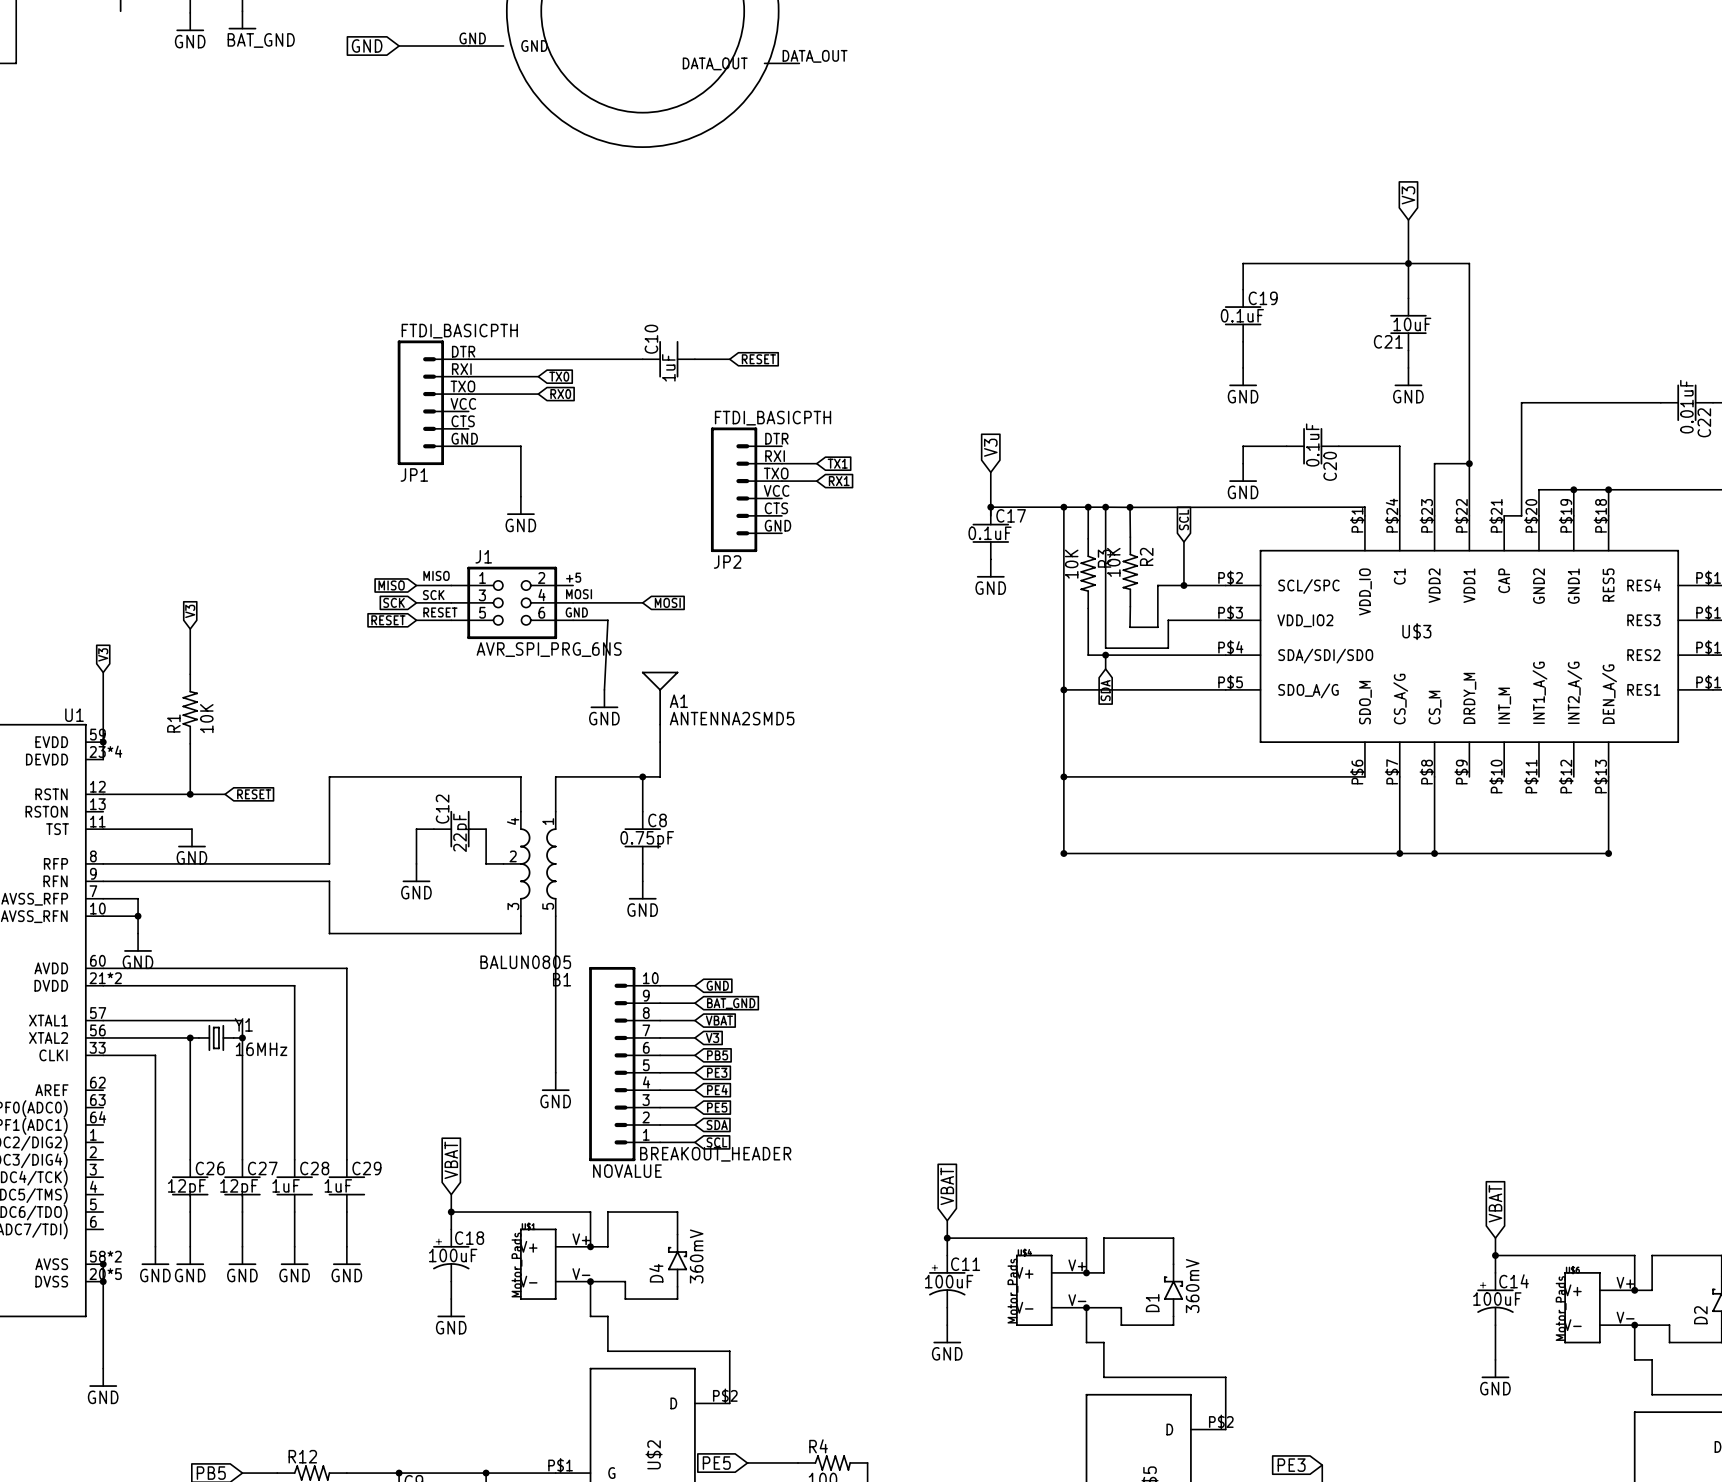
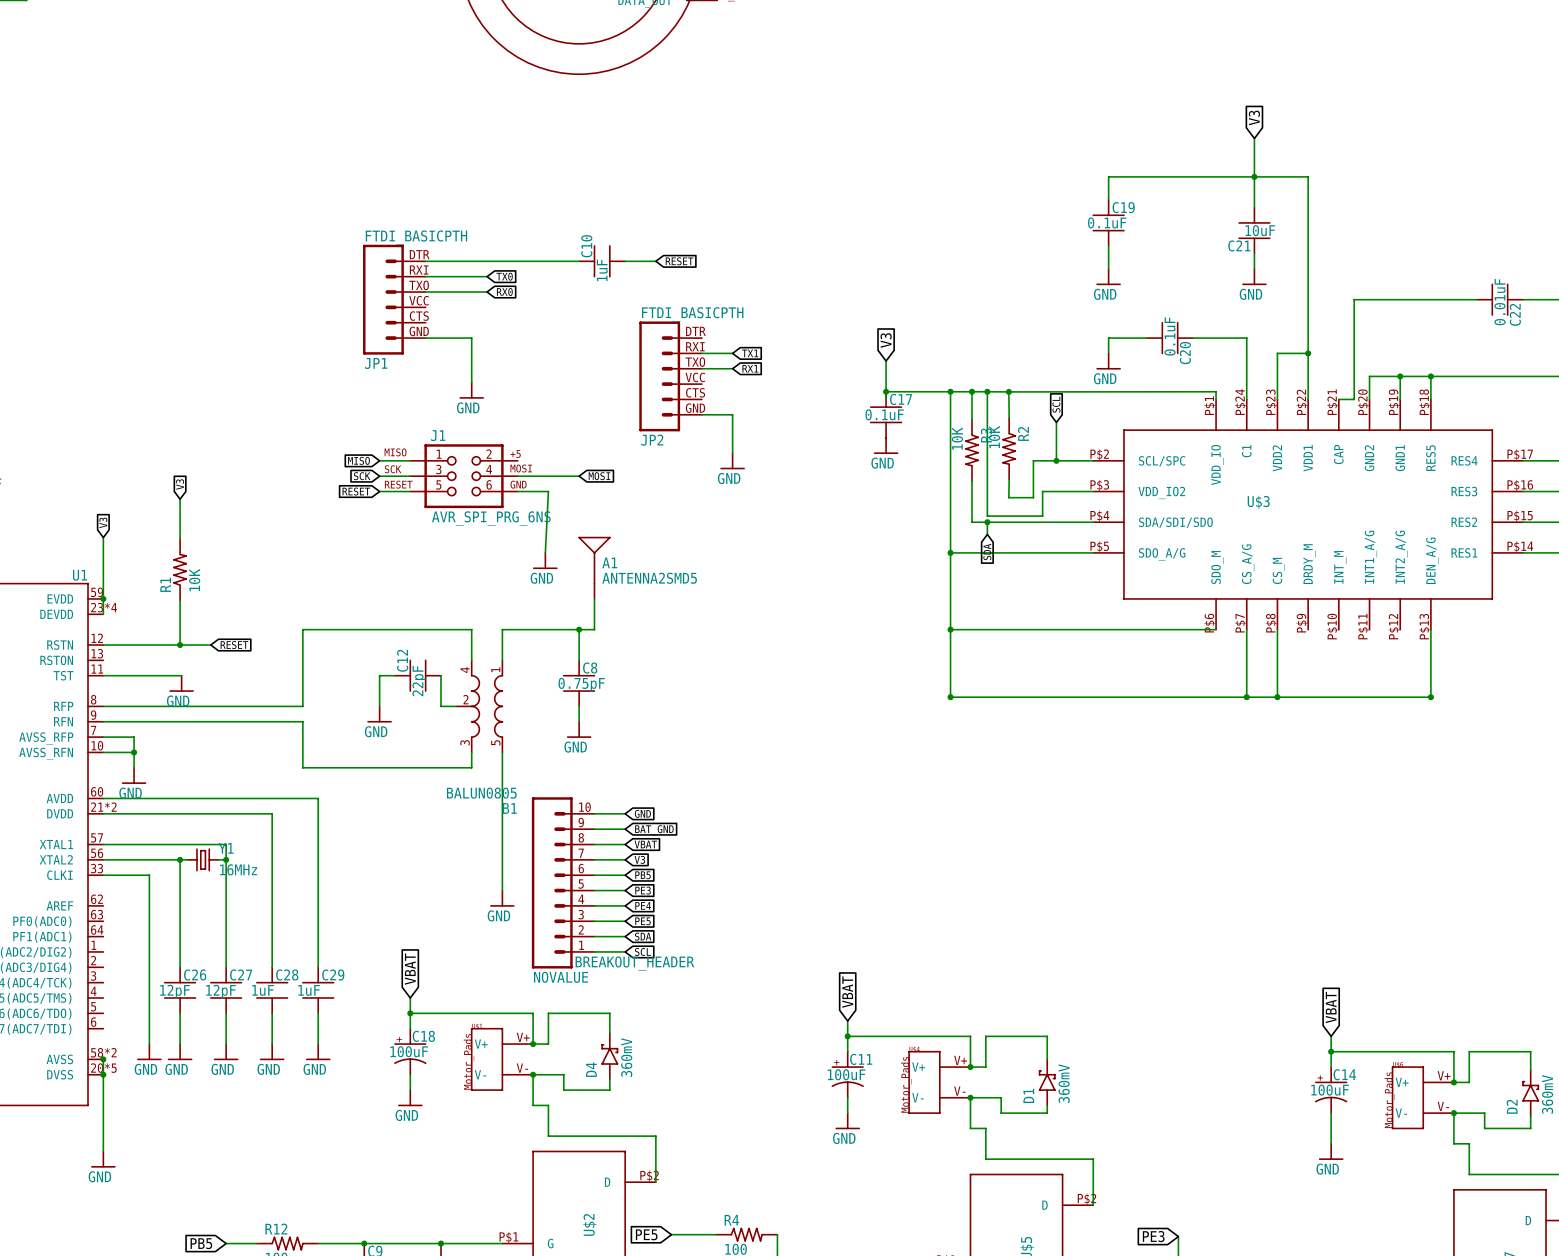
wire: none -> (701, 414) (732, 414) (732, 453)
power symbol: none -> GND (732, 461)

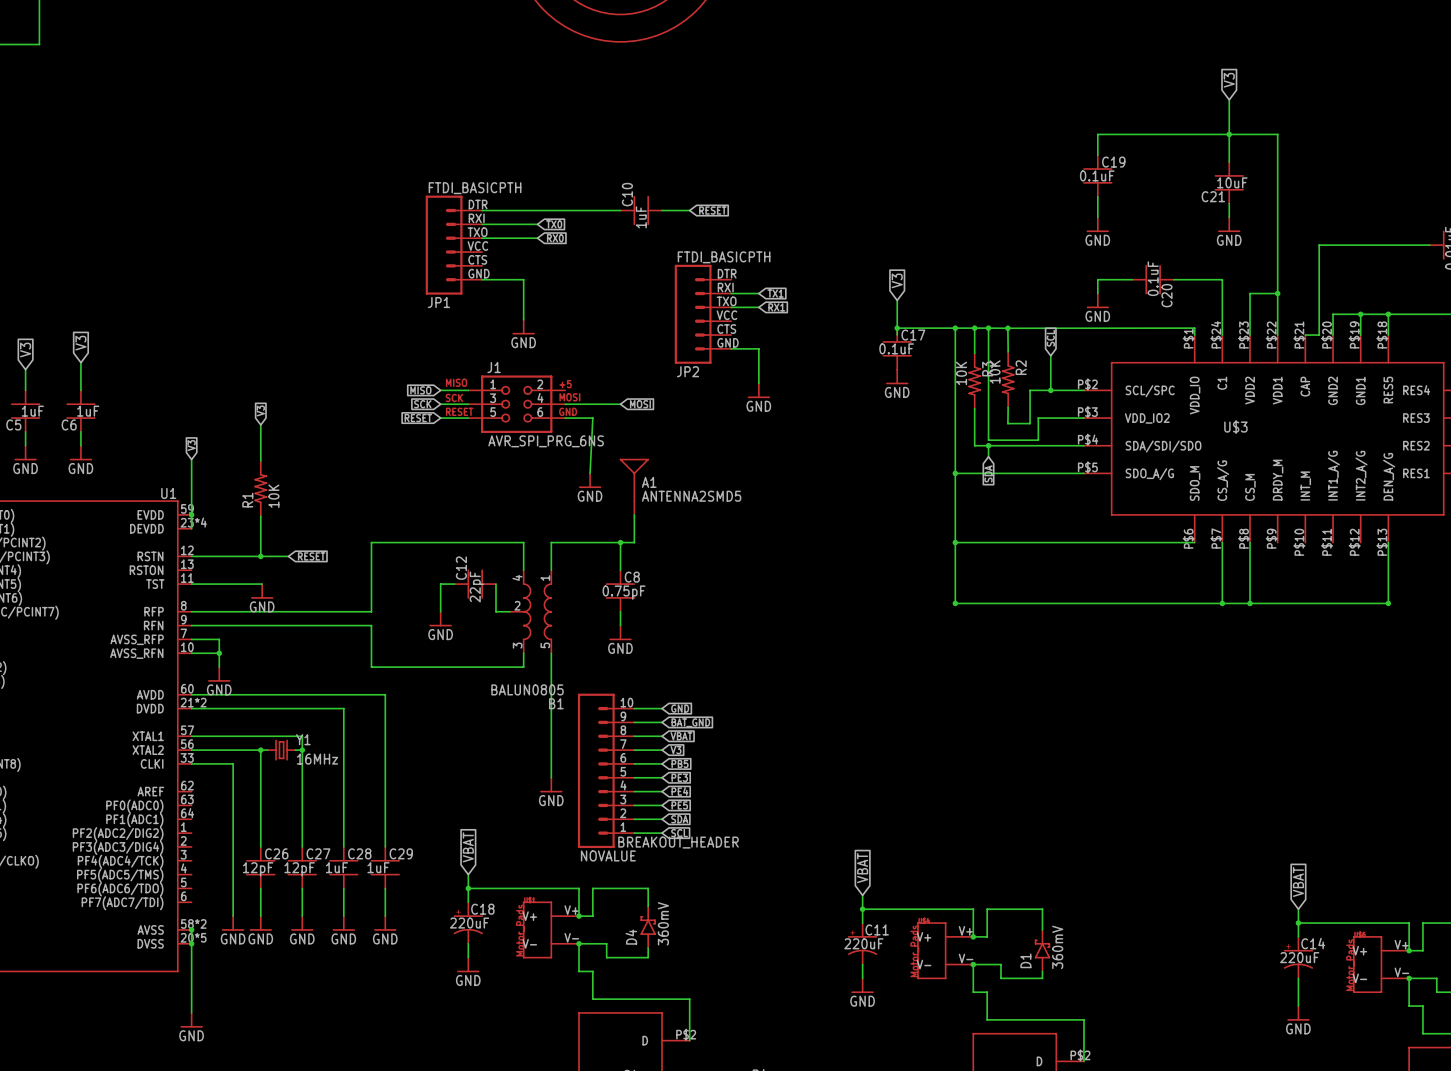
C18 value: 100uF (409, 1051) -> 220uF (469, 923)
C11 value: 100uF (846, 1074) -> 220uF (863, 943)
C14 value: 100uF (1330, 1090) -> 220uF (1299, 957)

